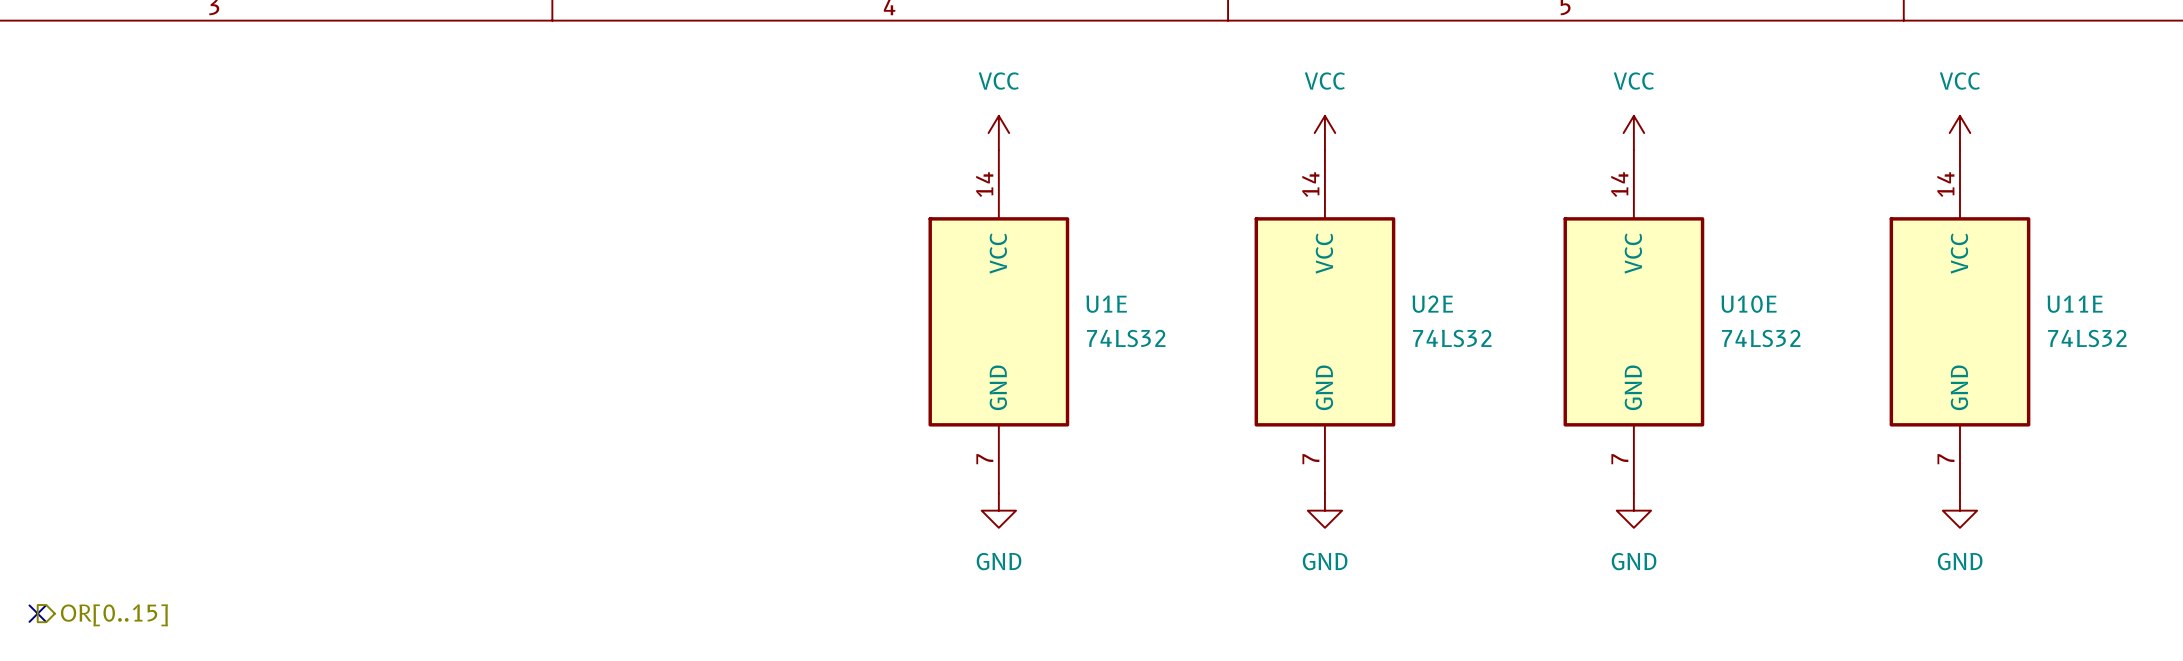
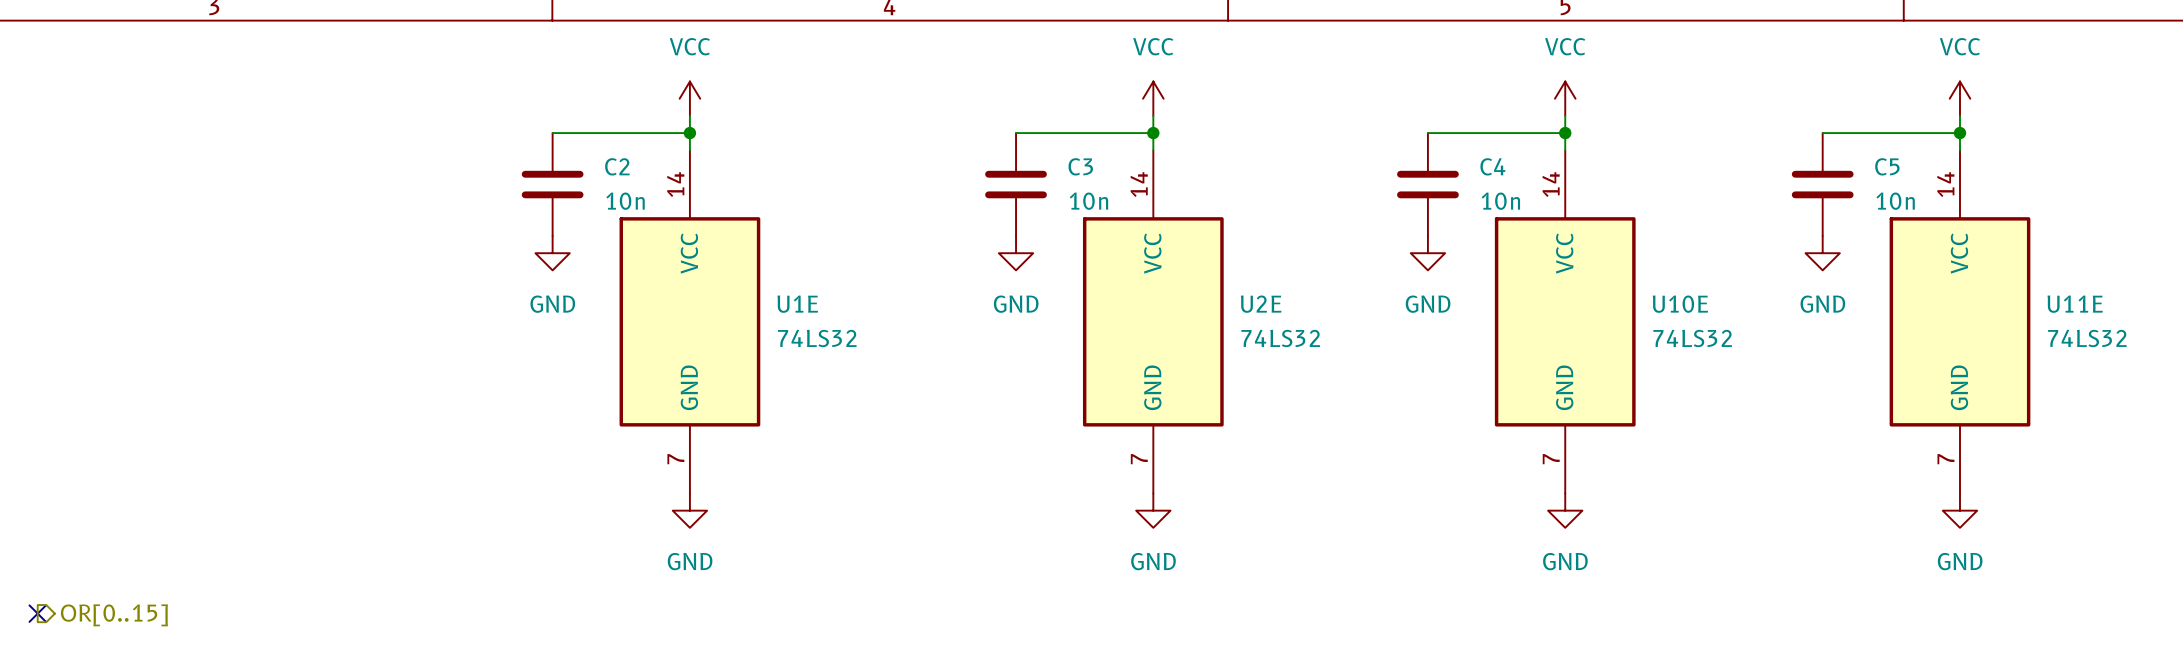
power symbol: none -> VCC (689, 98)
power symbol: none -> VCC (1153, 98)
wire: none -> (689, 115) (689, 150)
wire: none -> (1153, 115) (1153, 150)
wire: none -> (1565, 115) (1565, 150)
wire: none -> (552, 133) (689, 133)
junction: none -> (689, 133)
power symbol: VCC (998, 133) -> none
wire: none -> (1016, 133) (1153, 133)
junction: none -> (1153, 133)
power symbol: VCC (1324, 133) -> none
wire: none -> (1427, 133) (1565, 133)
junction: none -> (1565, 133)
power symbol position: VCC (1633, 133) -> VCC (1565, 98)
wire: none -> (1822, 133) (1959, 133)
power symbol position: VCC (1959, 133) -> VCC (1959, 98)
junction: none -> (1959, 133)
C2: none -> 10n (552, 184)
C3: none -> 10n (1016, 184)
C4: none -> 10n (1427, 184)
C5: none -> 10n (1822, 184)
power symbol: none -> GND (552, 253)
power symbol: none -> GND (1016, 253)
power symbol: none -> GND (1427, 253)
power symbol: none -> GND (1822, 253)
U1E position: (998, 321) -> (689, 321)
U2E position: (1324, 321) -> (1153, 321)
U10E position: (1633, 321) -> (1565, 321)
power symbol: none -> GND (689, 510)
power symbol: GND (998, 510) -> none
power symbol: none -> GND (1153, 510)
power symbol: GND (1324, 510) -> none
power symbol position: GND (1633, 510) -> GND (1565, 510)

